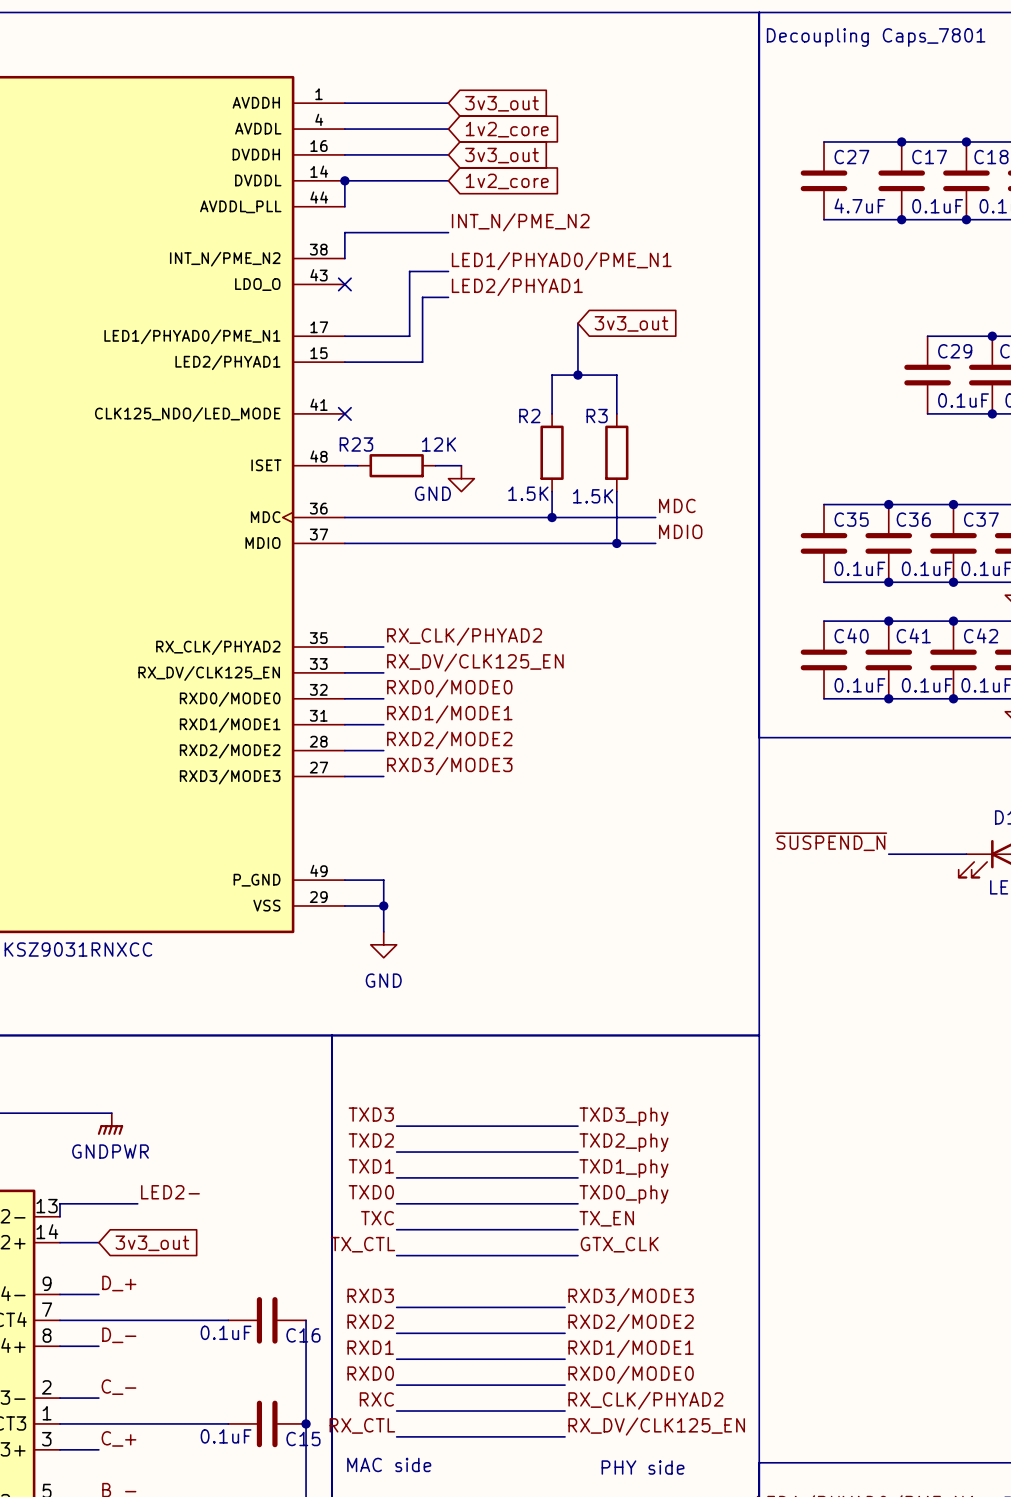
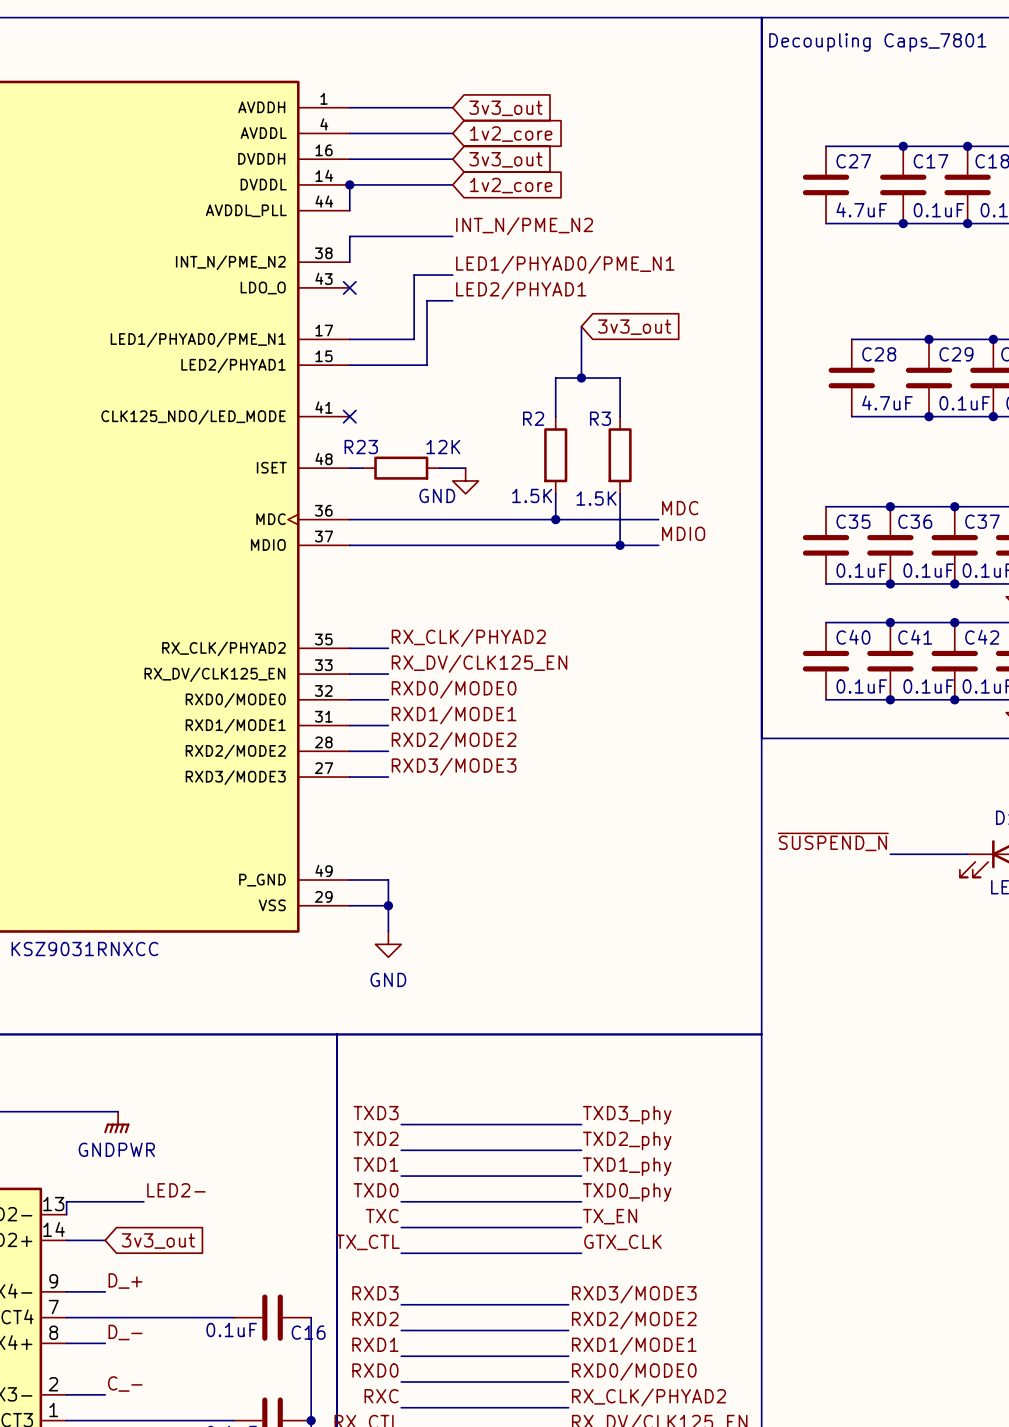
wire: none -> (851, 339) (929, 339)
junction: none -> (929, 339)
C28: none -> 4.7uF (851, 378)
wire: none -> (851, 416) (929, 416)
junction: none -> (929, 416)

